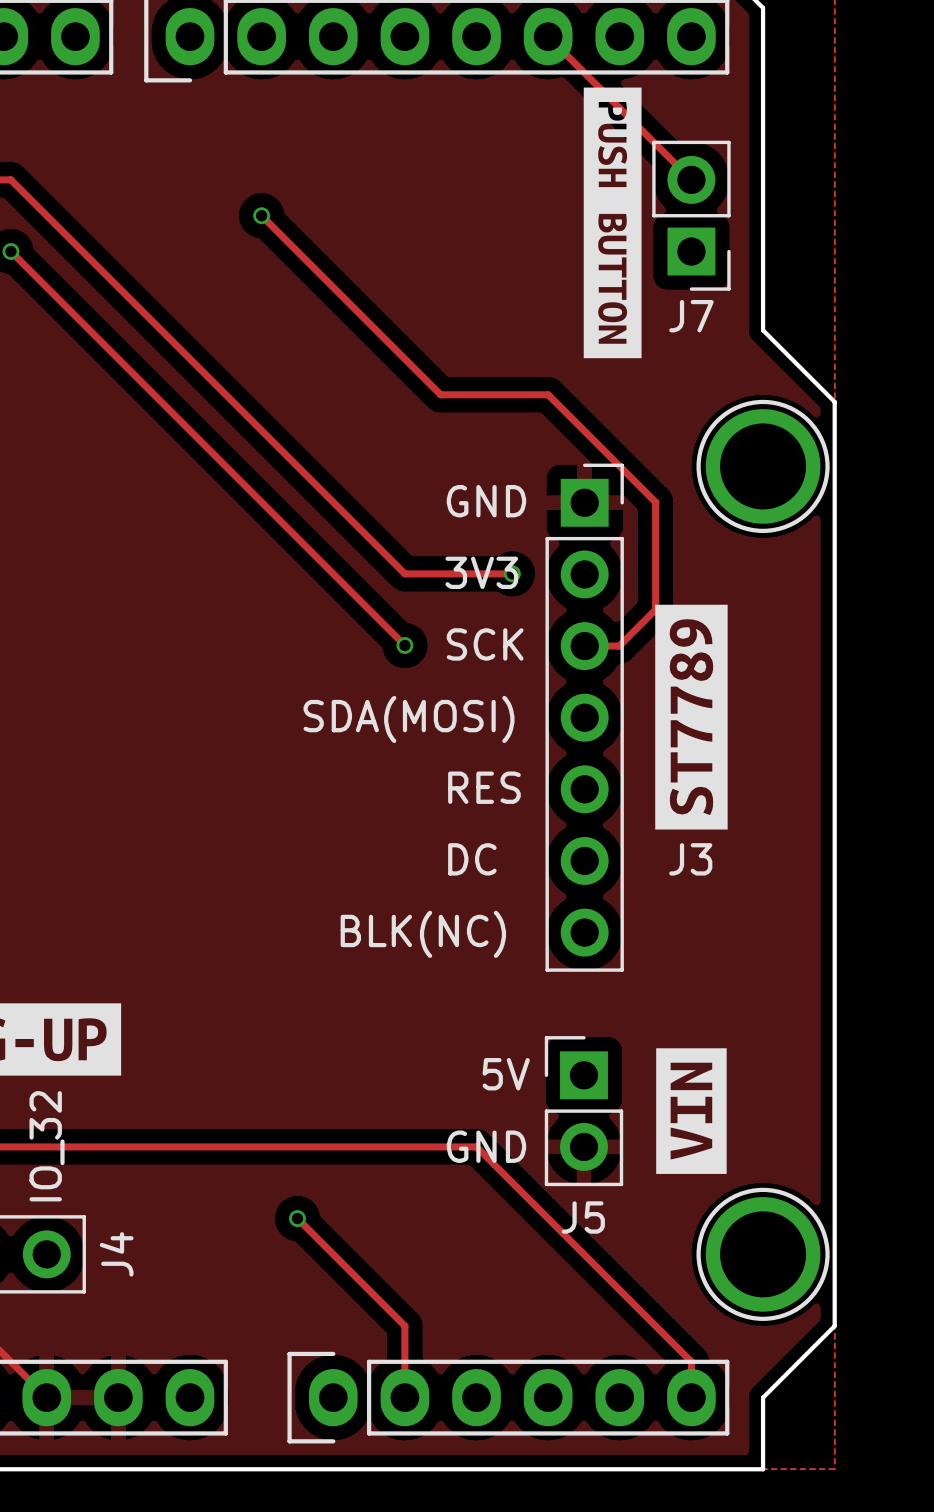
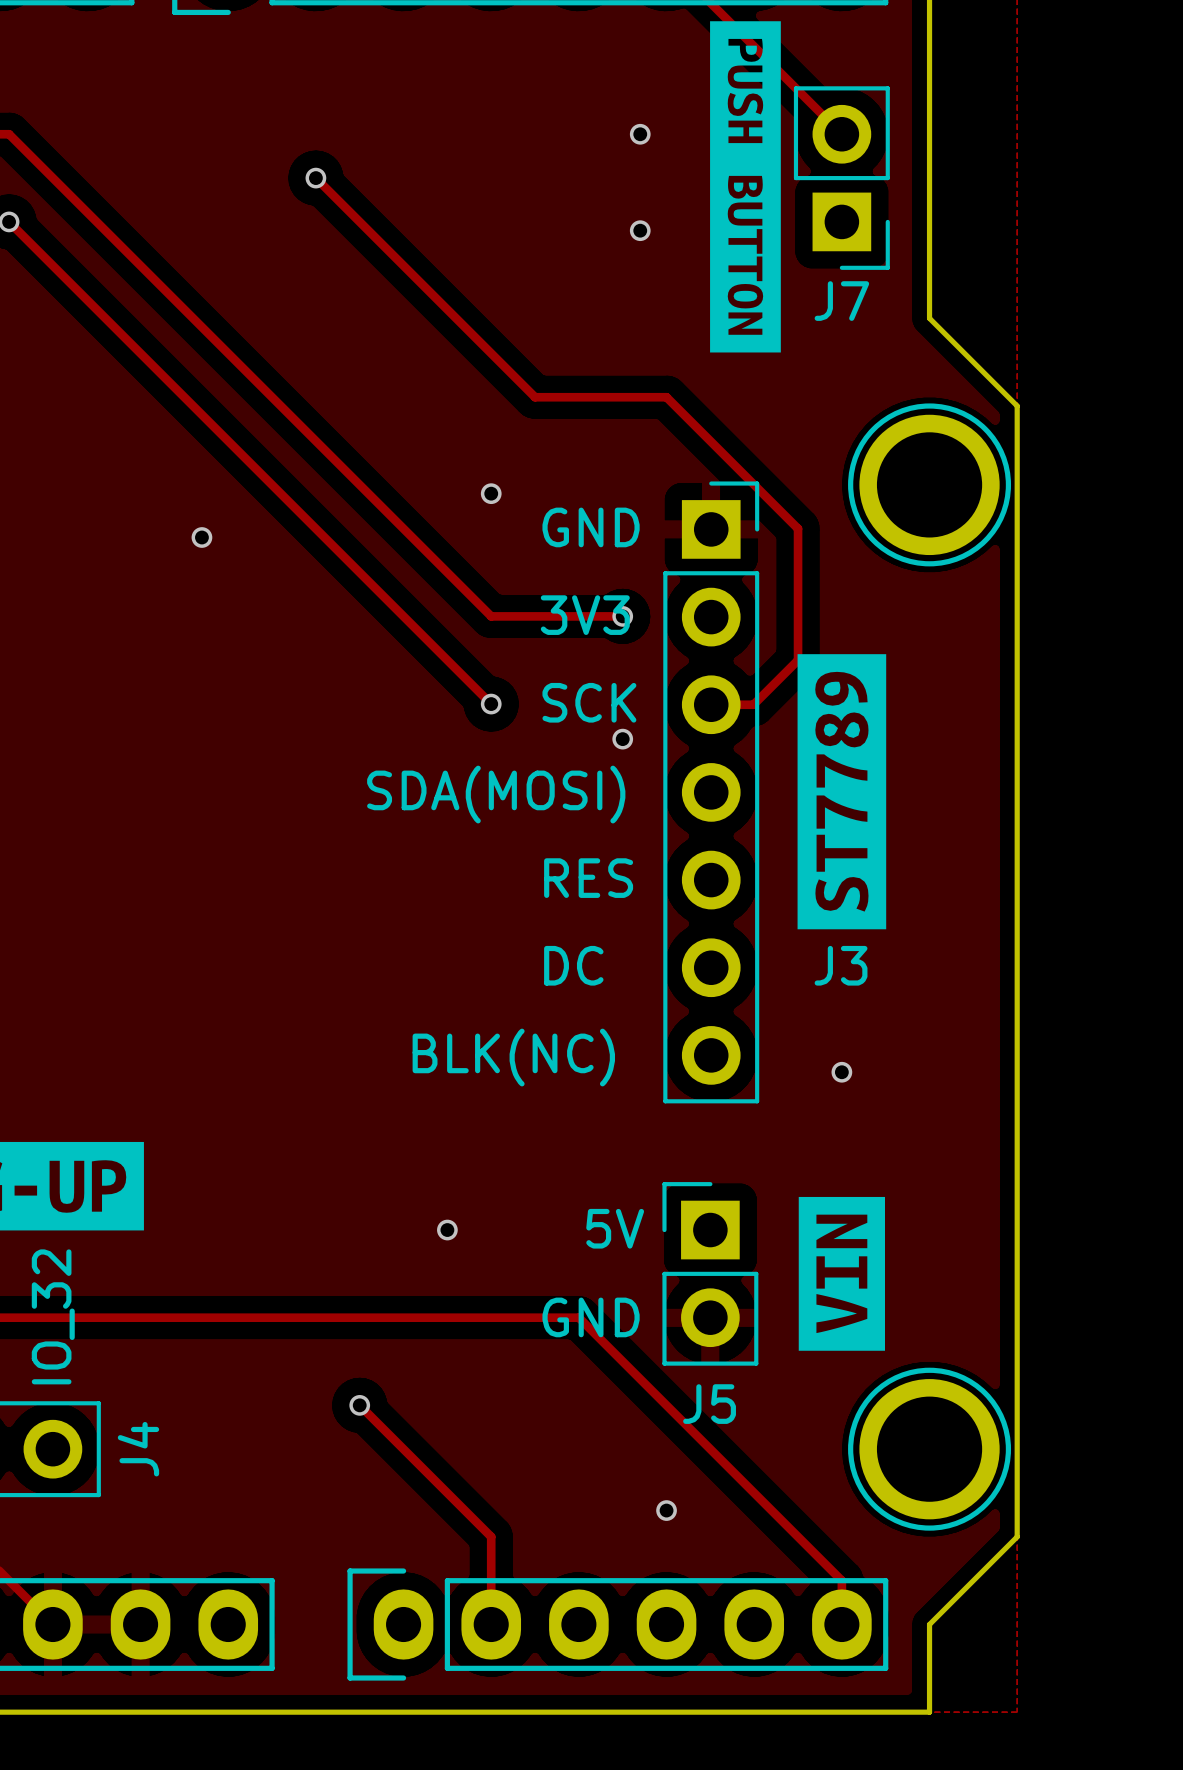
via: none -> (640, 134)
via: none -> (640, 230)
via: none -> (491, 493)
via: none -> (201, 537)
via: none -> (622, 739)
via: none -> (841, 1072)
via: none -> (447, 1230)
via: none -> (666, 1510)

